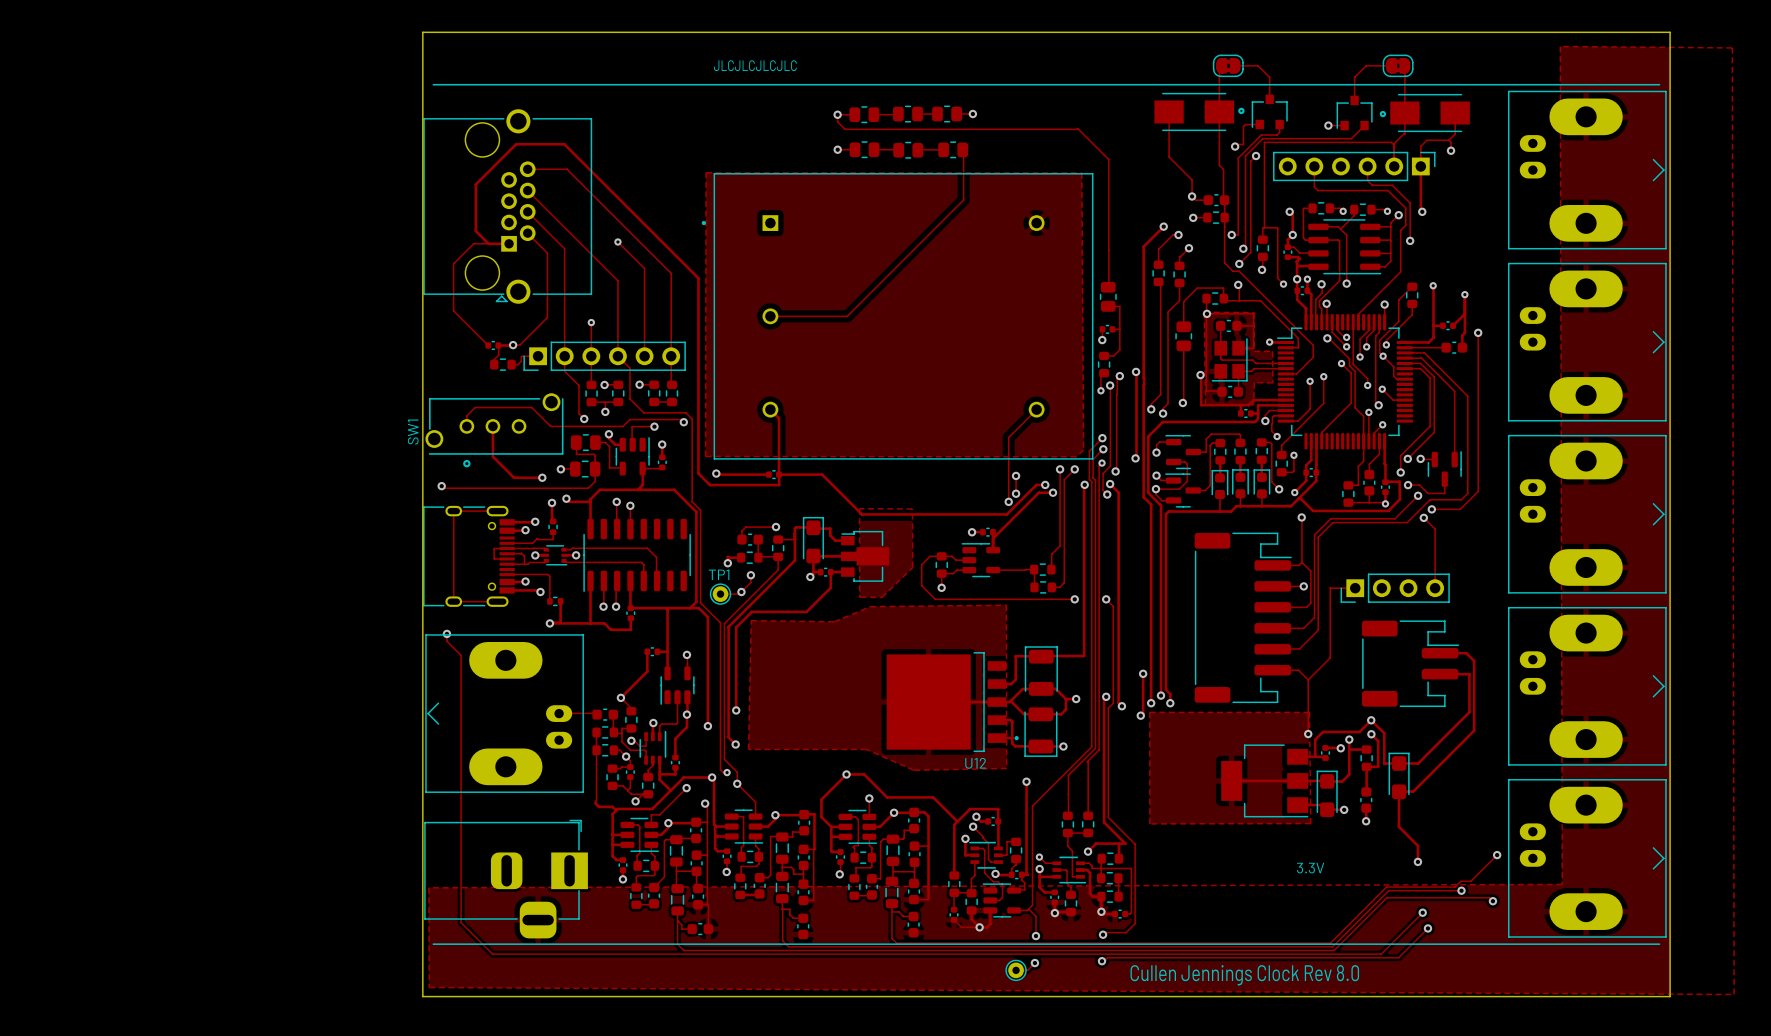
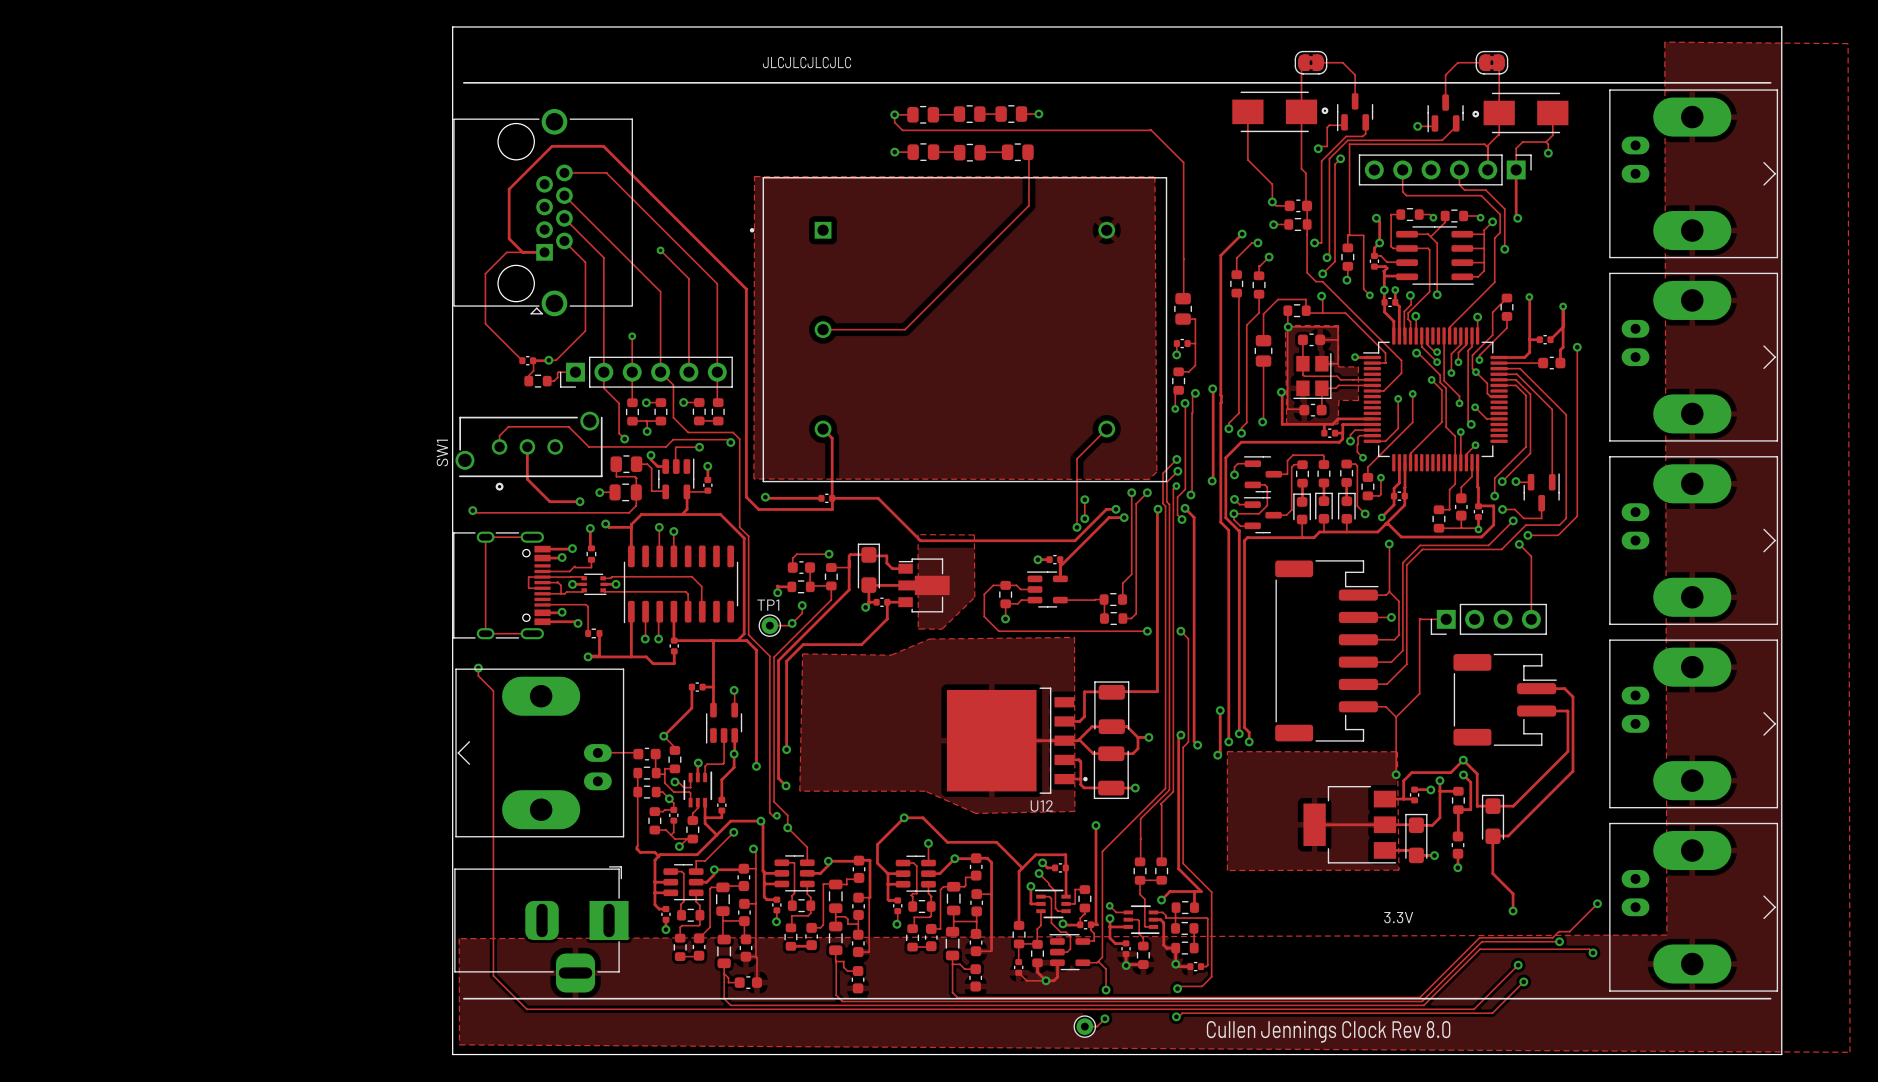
part footprint: [1251, 94, 1288, 130] -> [1337, 93, 1374, 132]
part footprint: [1336, 95, 1373, 131] -> [1427, 94, 1464, 133]

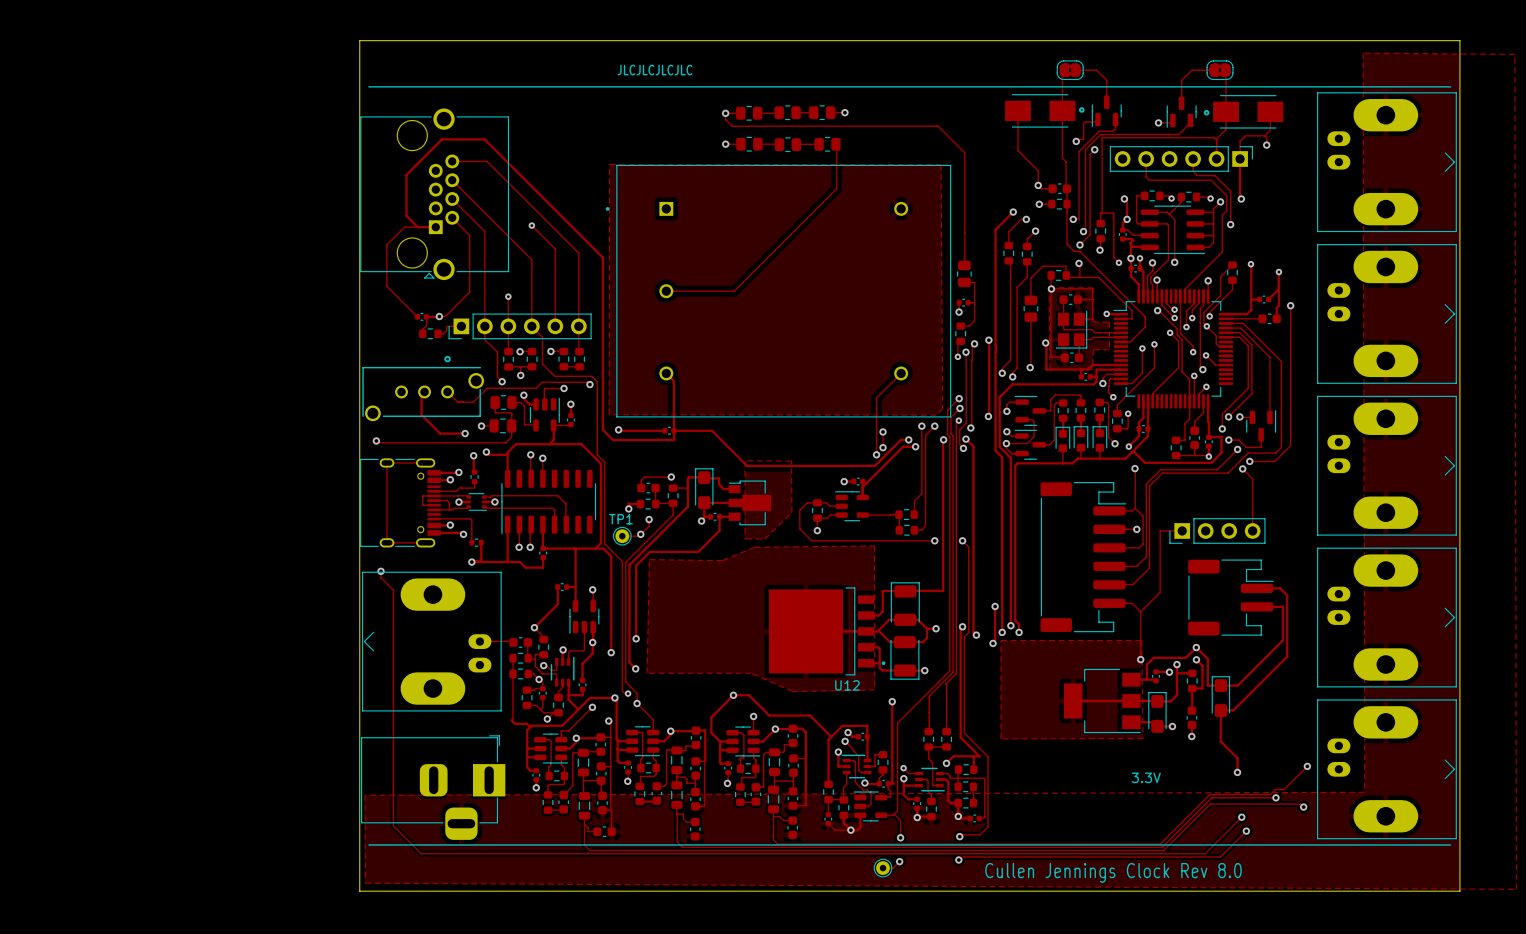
track: (499, 446) (499, 435) (508, 426) (568, 426) (588, 446) (606, 446) -> (447, 391) (457, 402) (473, 402) (487, 388)
part: none -> (423, 388)
SW1: (529, 451) -> none

